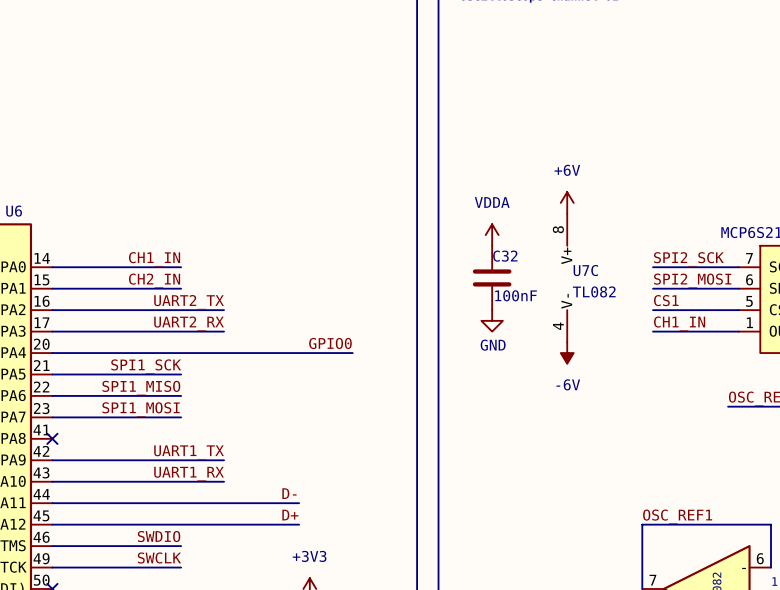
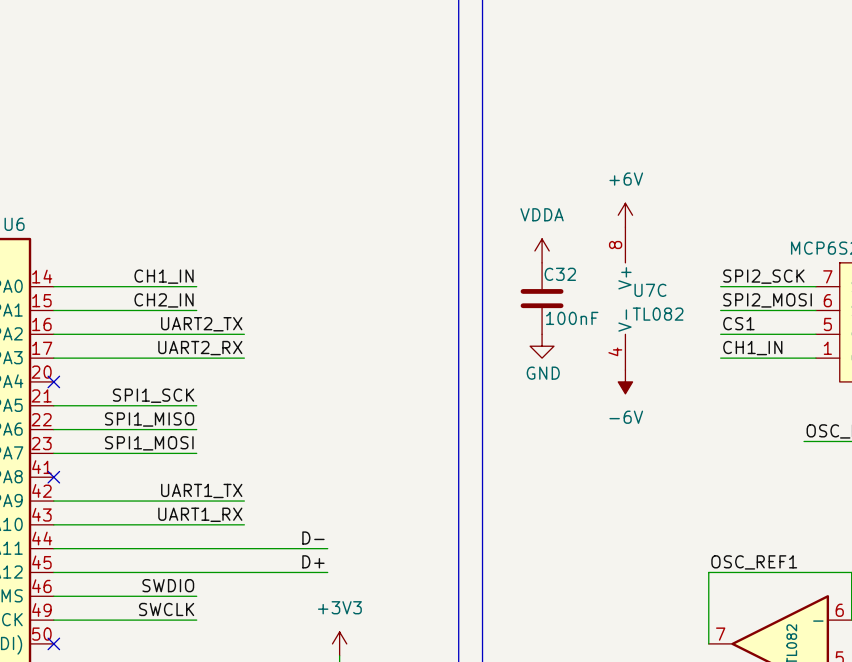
label: GPIO0 (330, 343) -> none
wire: (52, 353) (352, 353) -> none
no-connect mark: none -> (53, 381)

